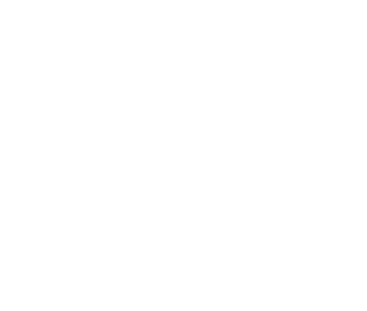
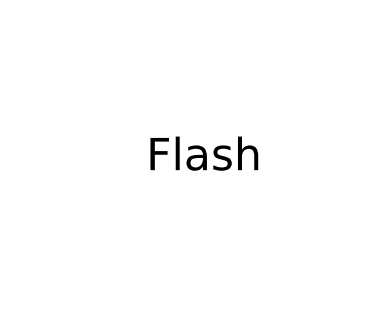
text: none -> Flash (204, 153)

